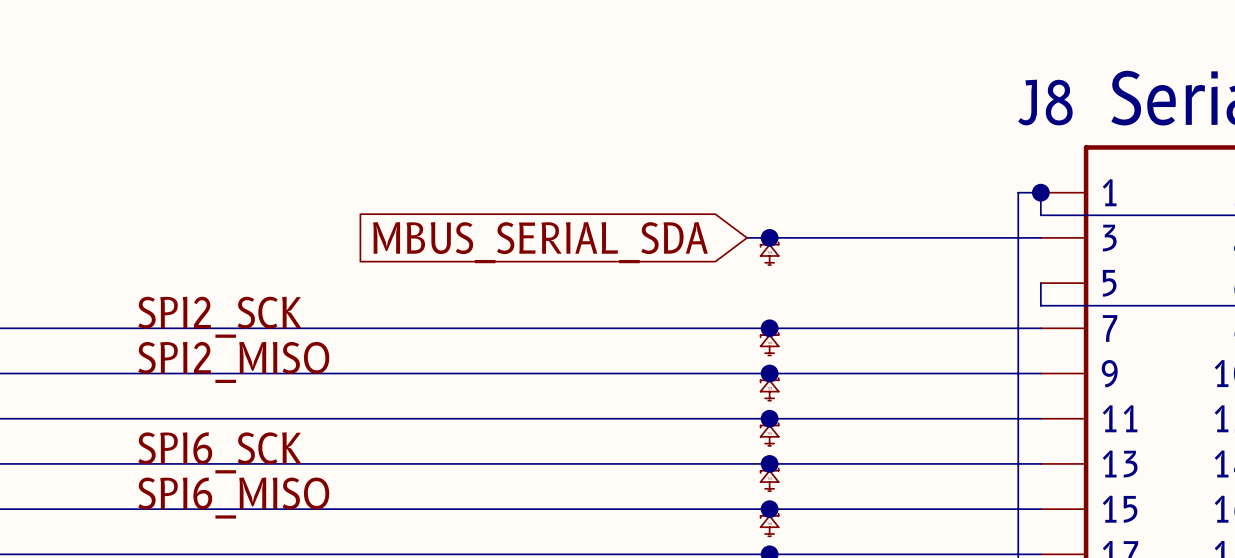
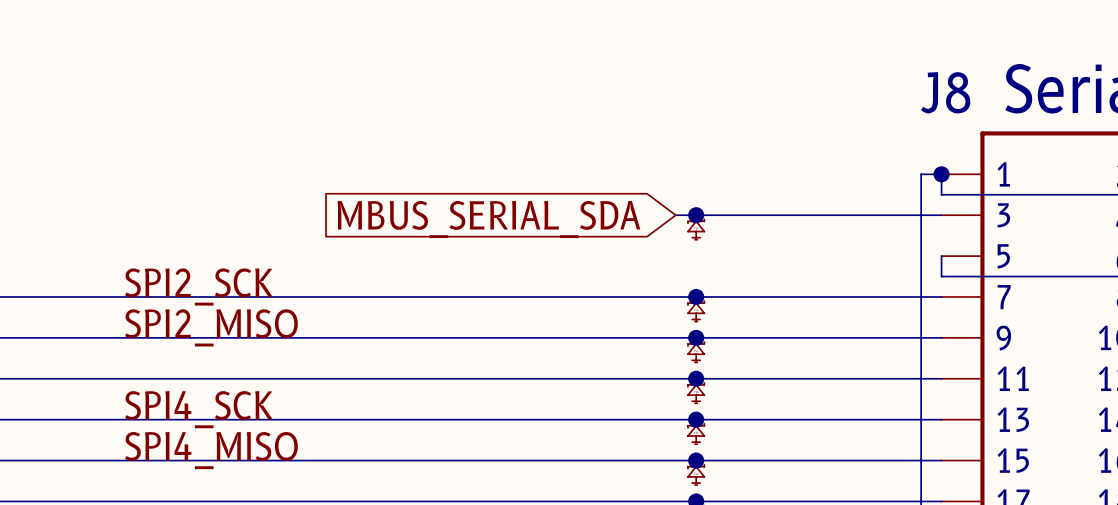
label: SPI6_SCK (219, 452) -> SPI4_SCK (198, 409)
label: SPI6_MISO (233, 498) -> SPI4_MISO (211, 450)

